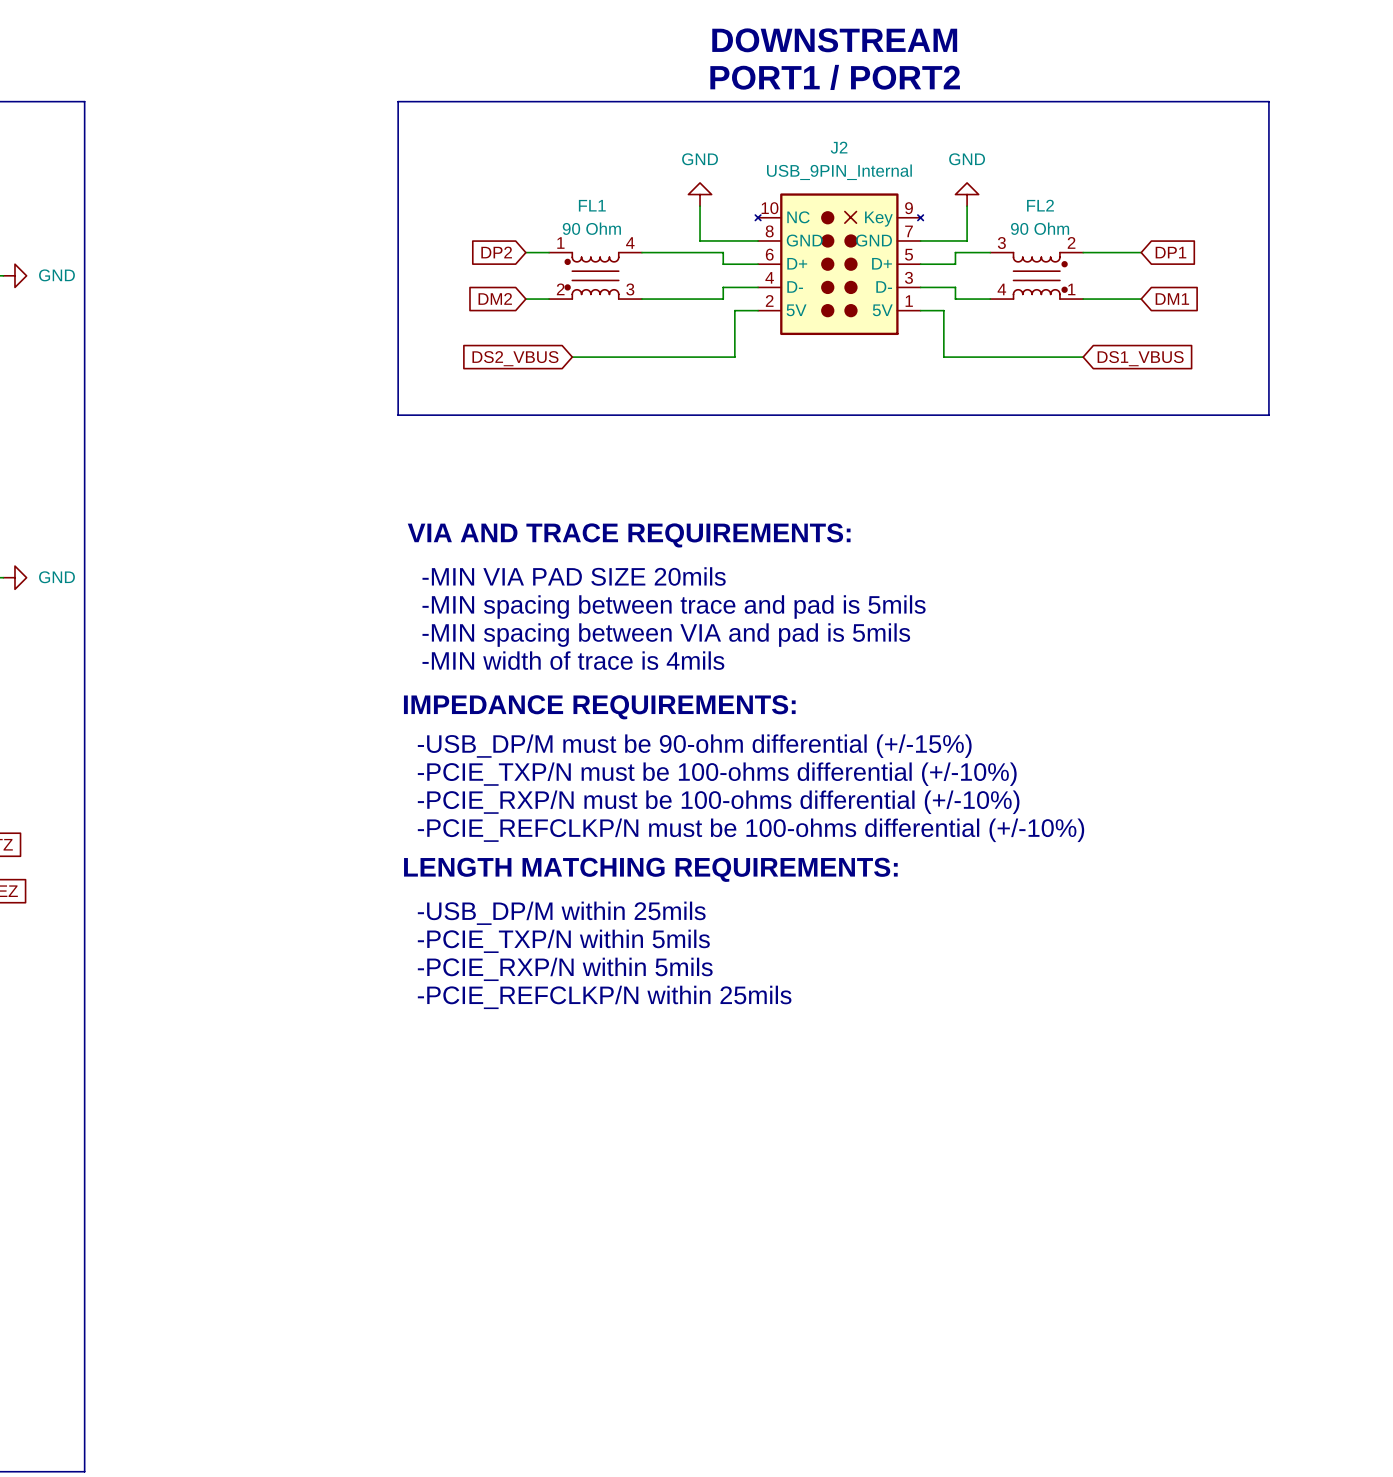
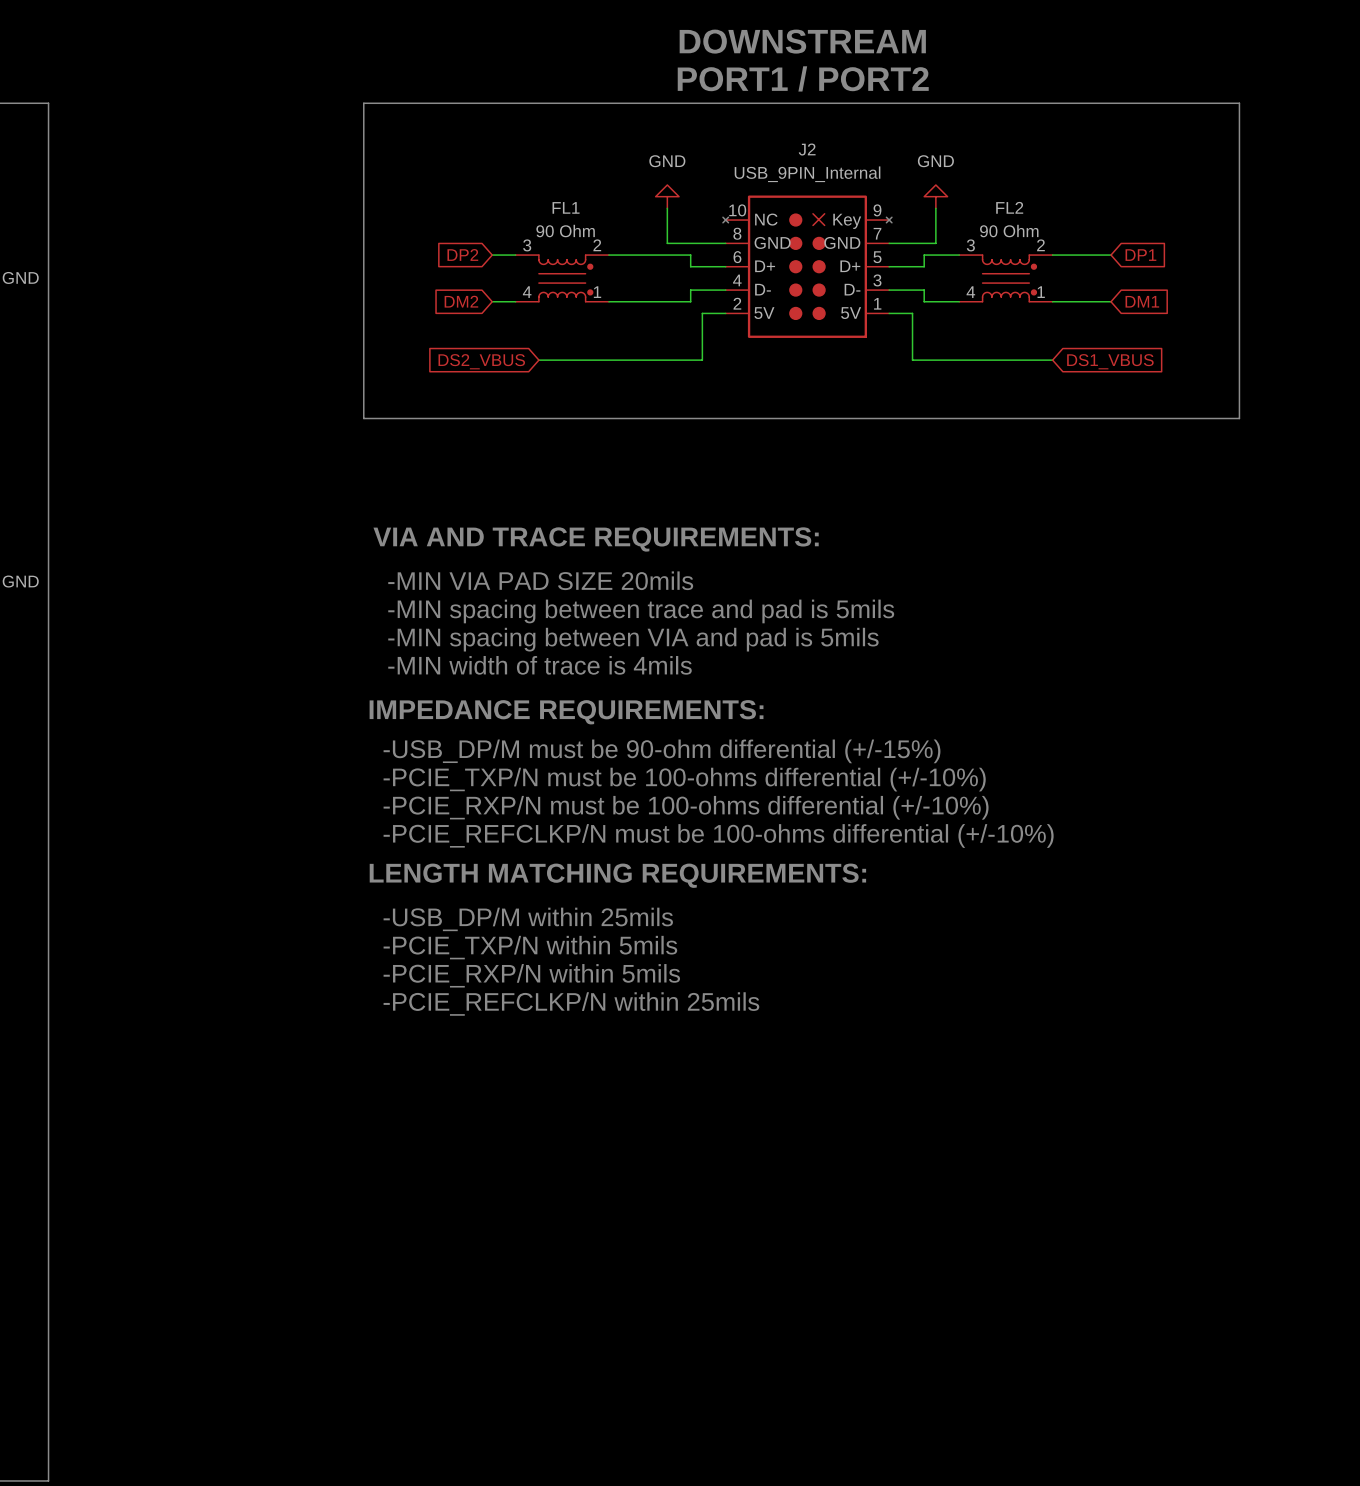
FL1 rotation: 0° (592, 275) -> 180° (565, 278)

